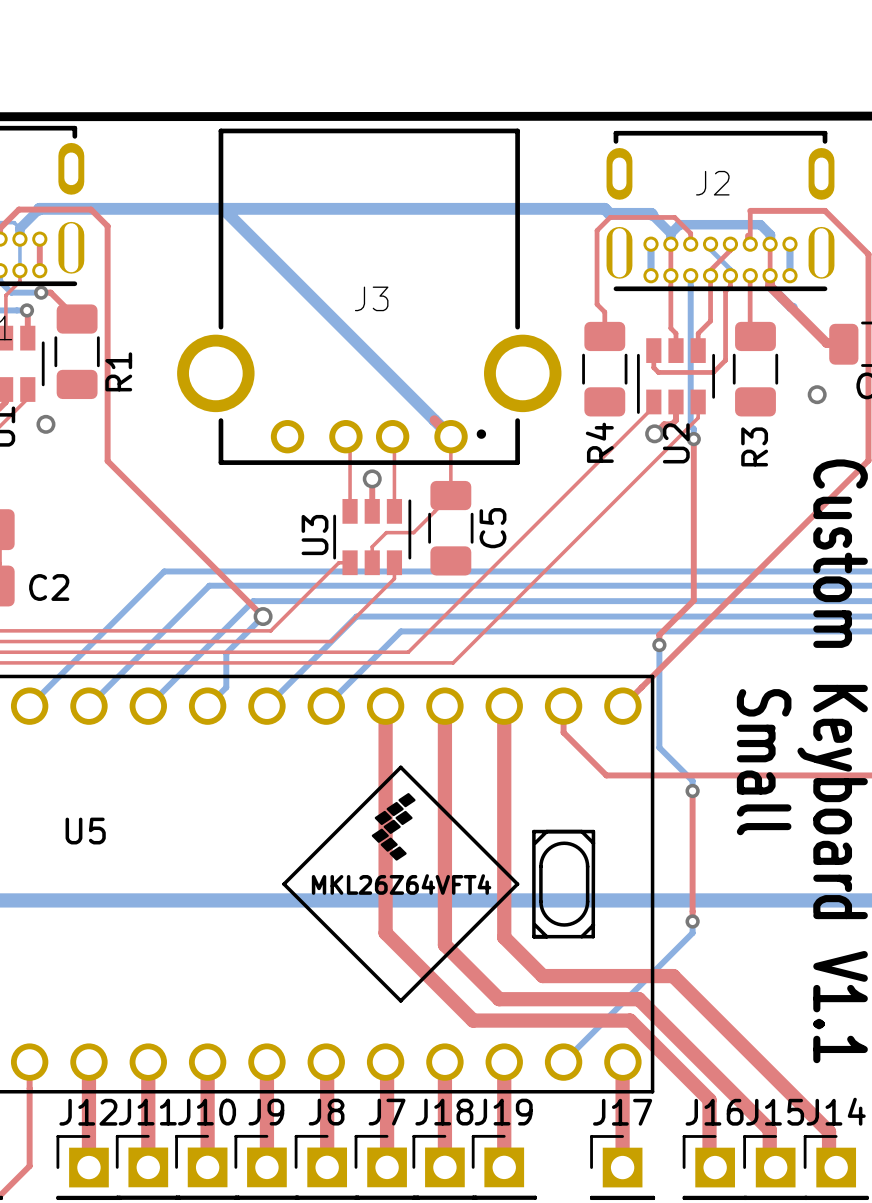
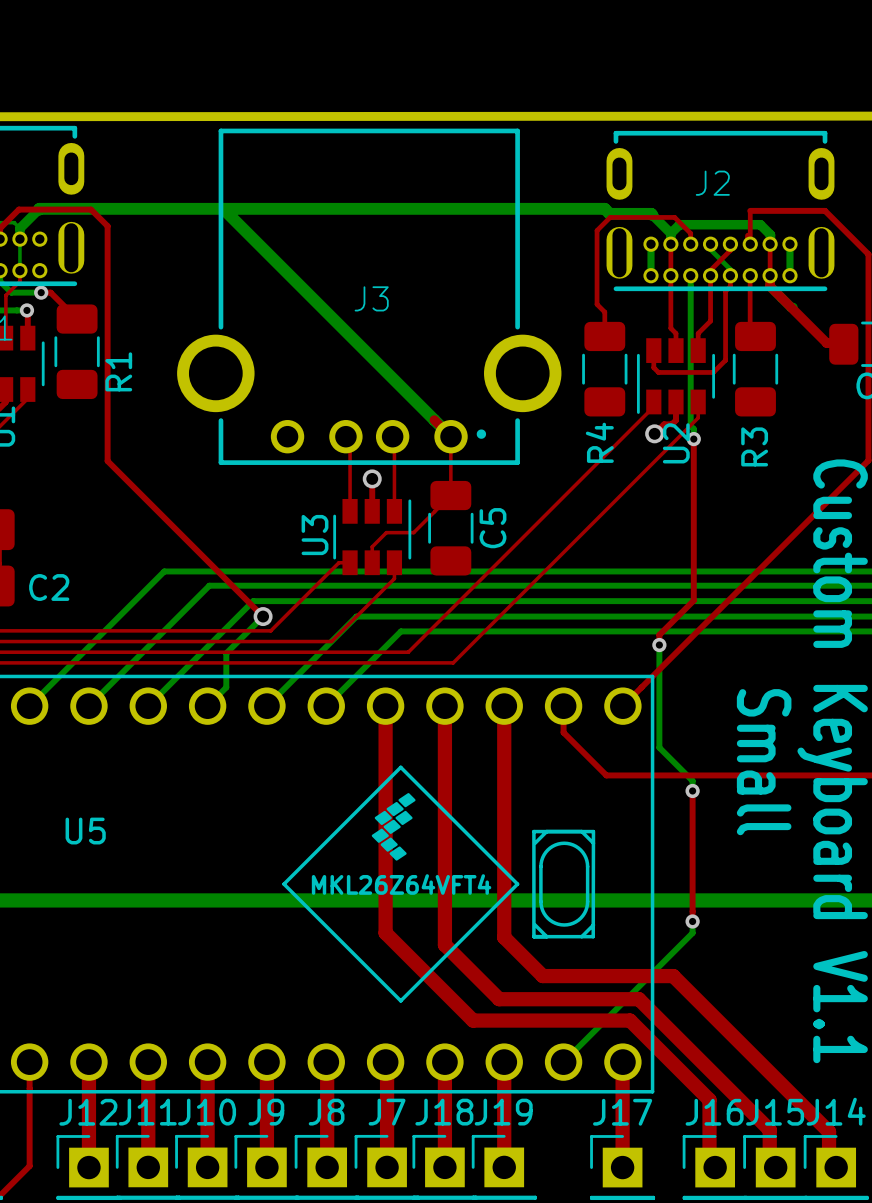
top track: (39, 239) (39, 270) -> none
via: (817, 394) -> none
via: (45, 424) -> none

